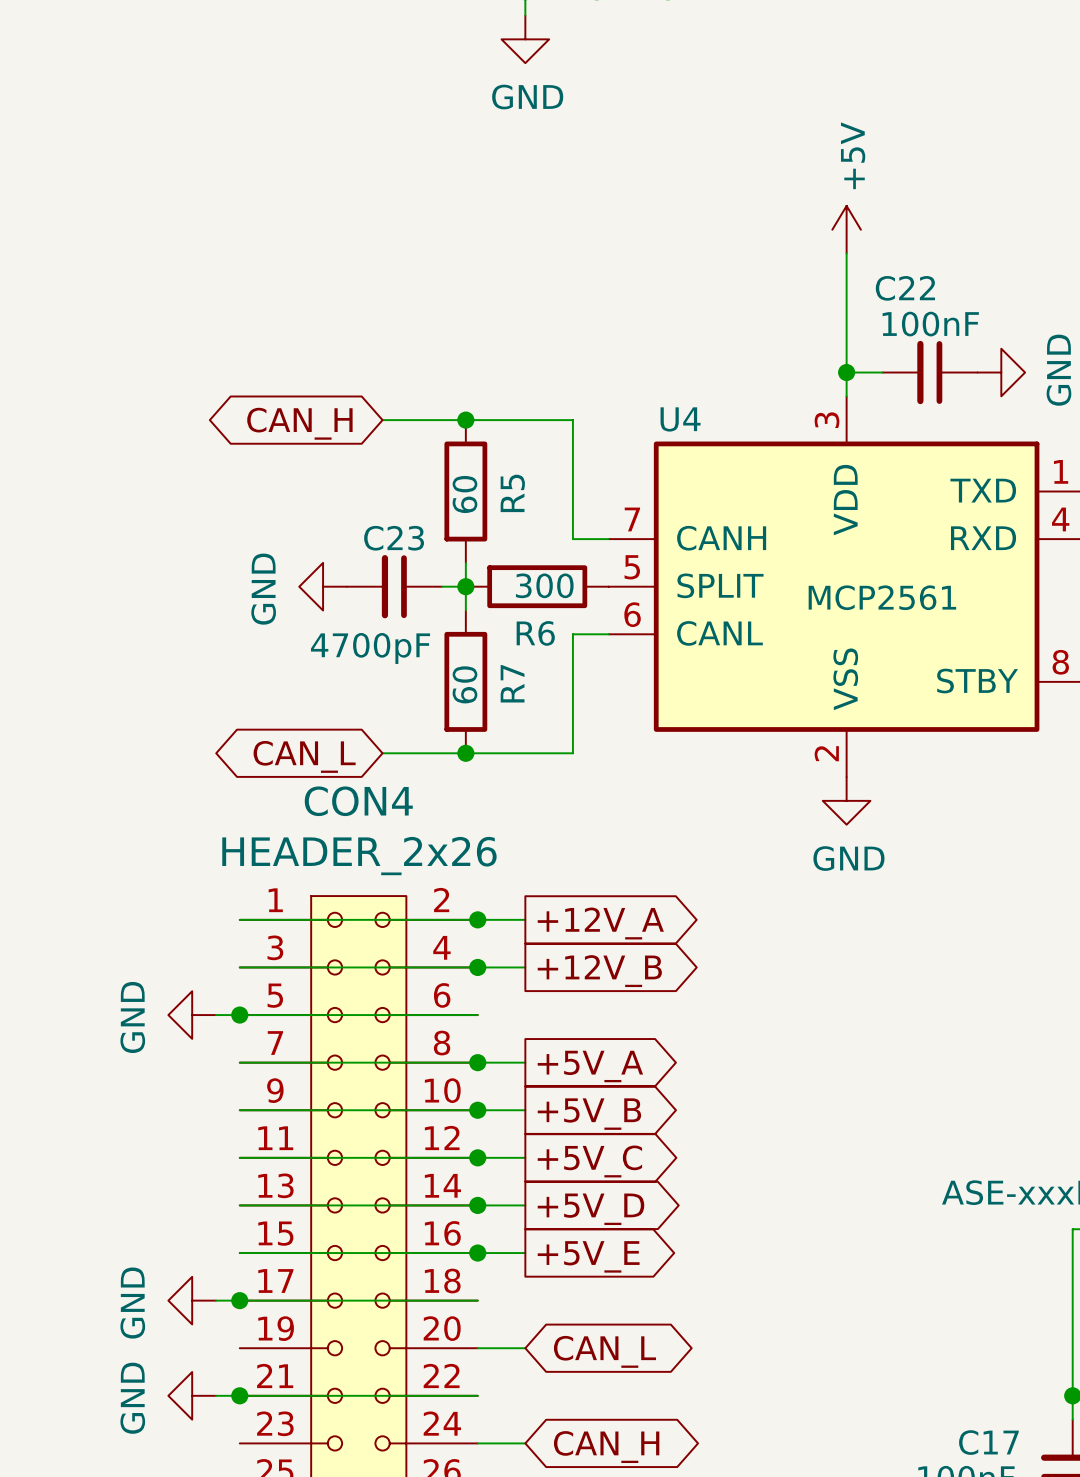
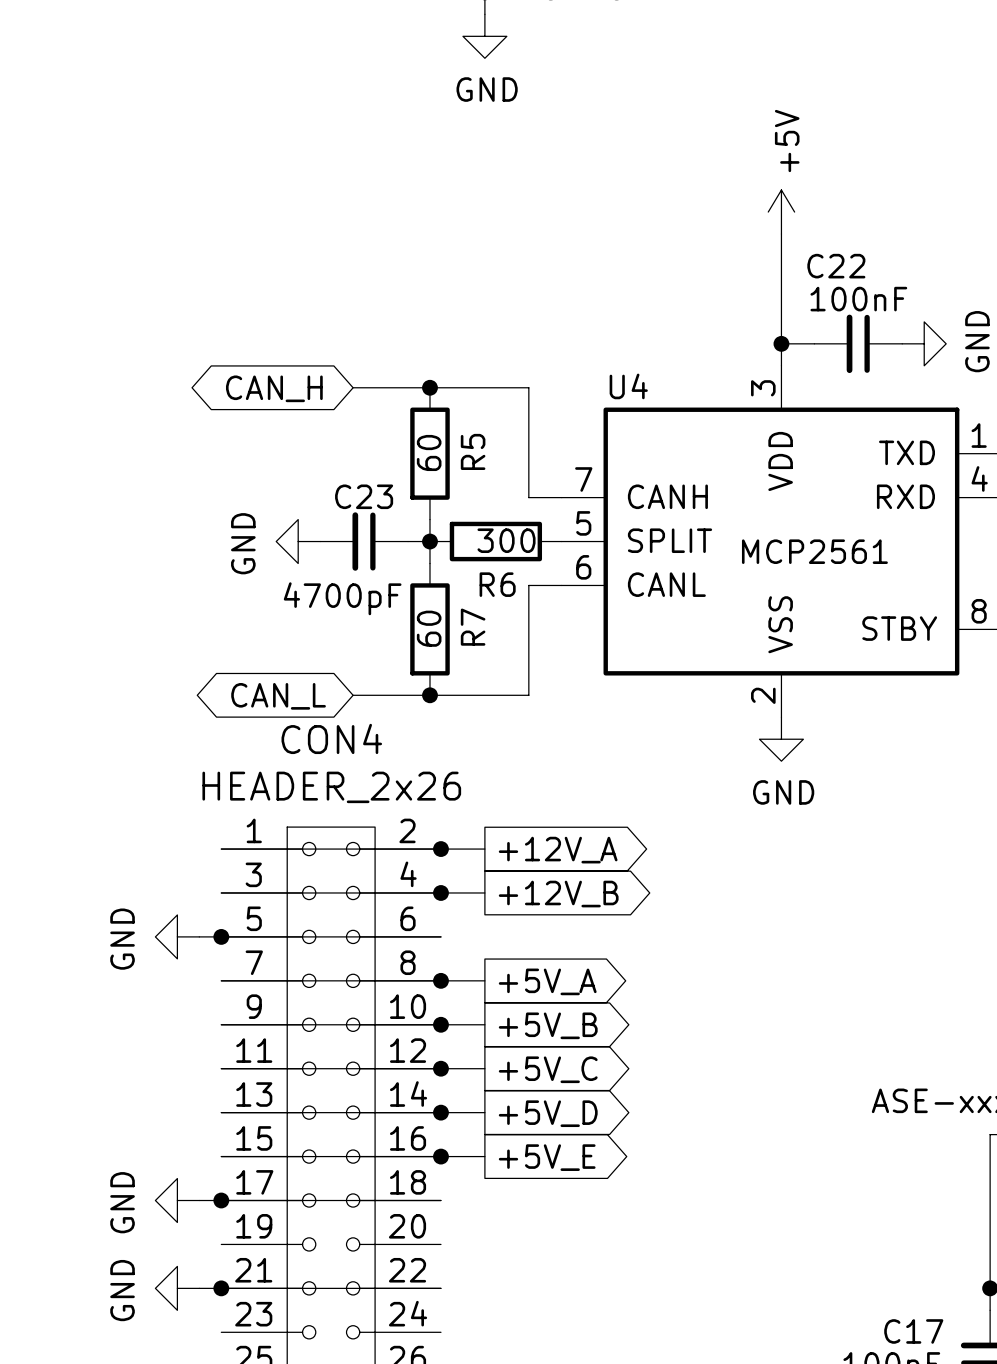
wire: (477, 1348) (525, 1348) -> none
global label: CAN_L (604, 1351) -> none
wire: (477, 1443) (525, 1443) -> none
global label: CAN_H (606, 1447) -> none

